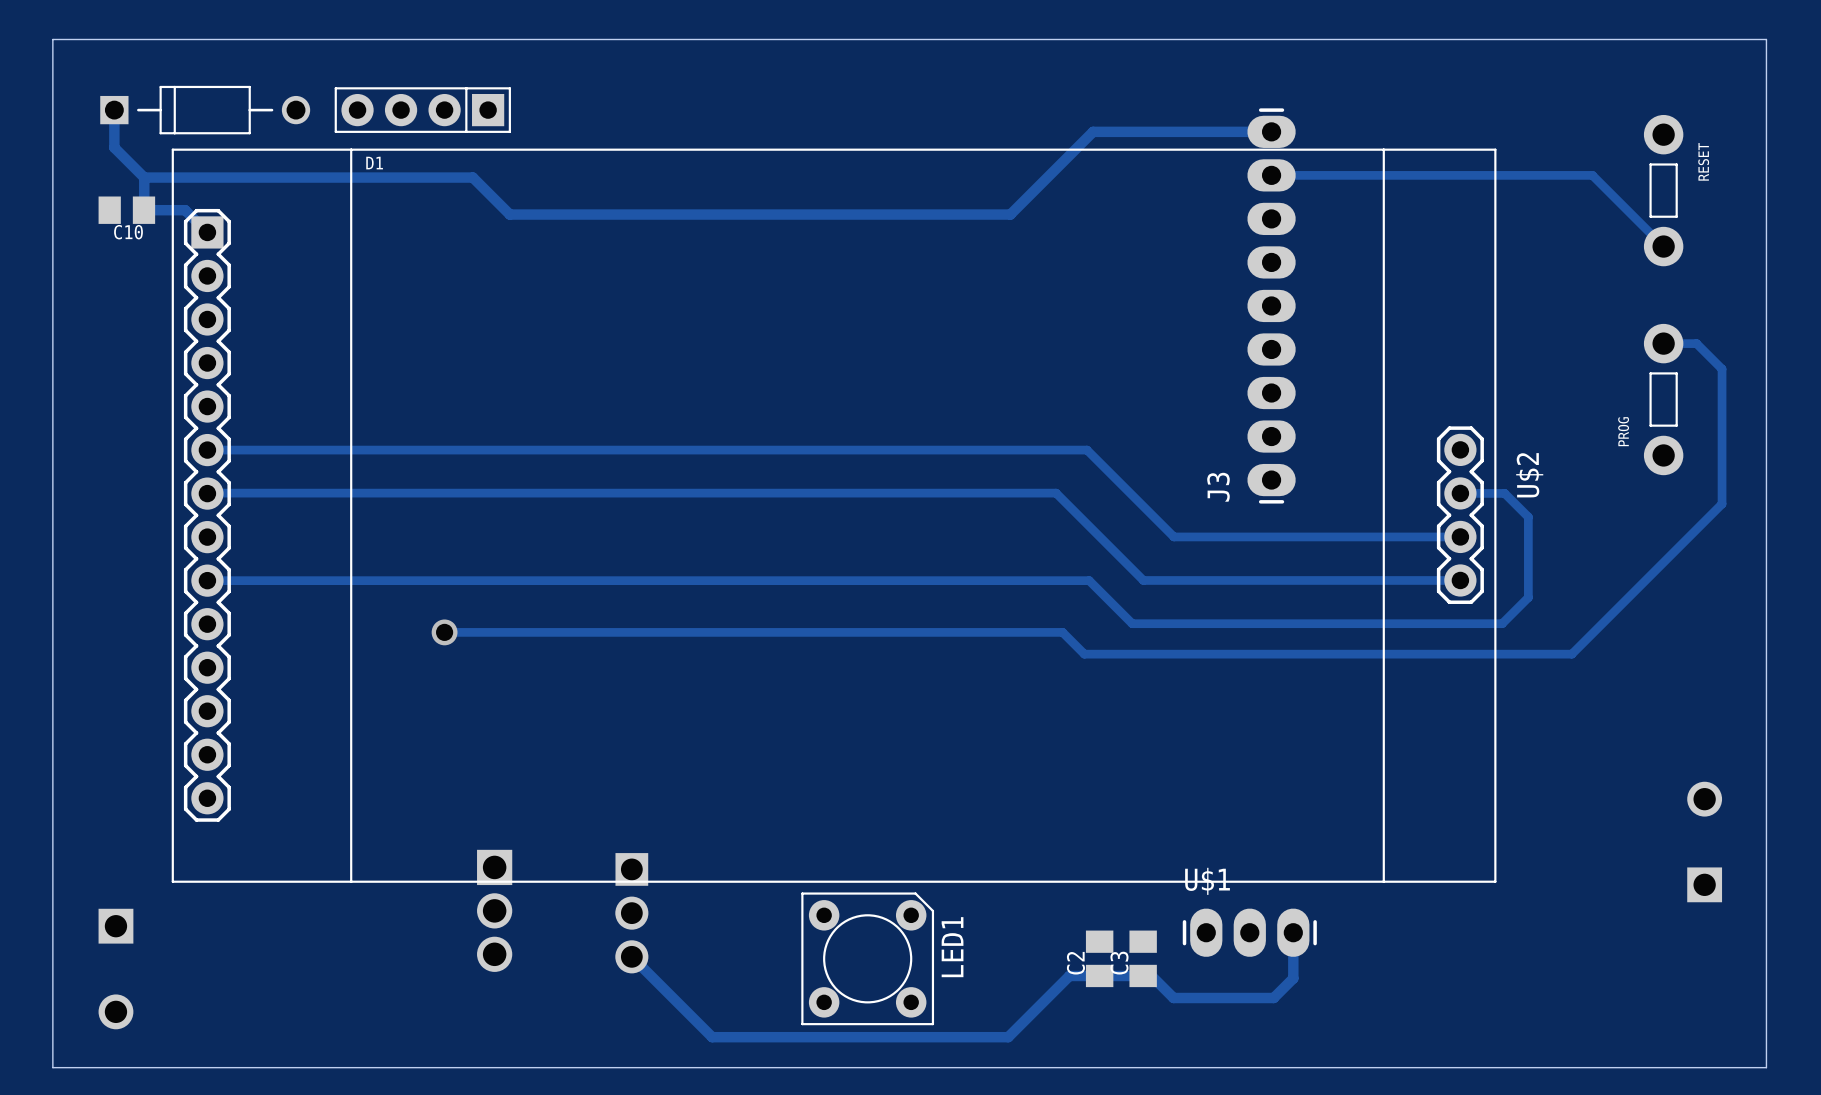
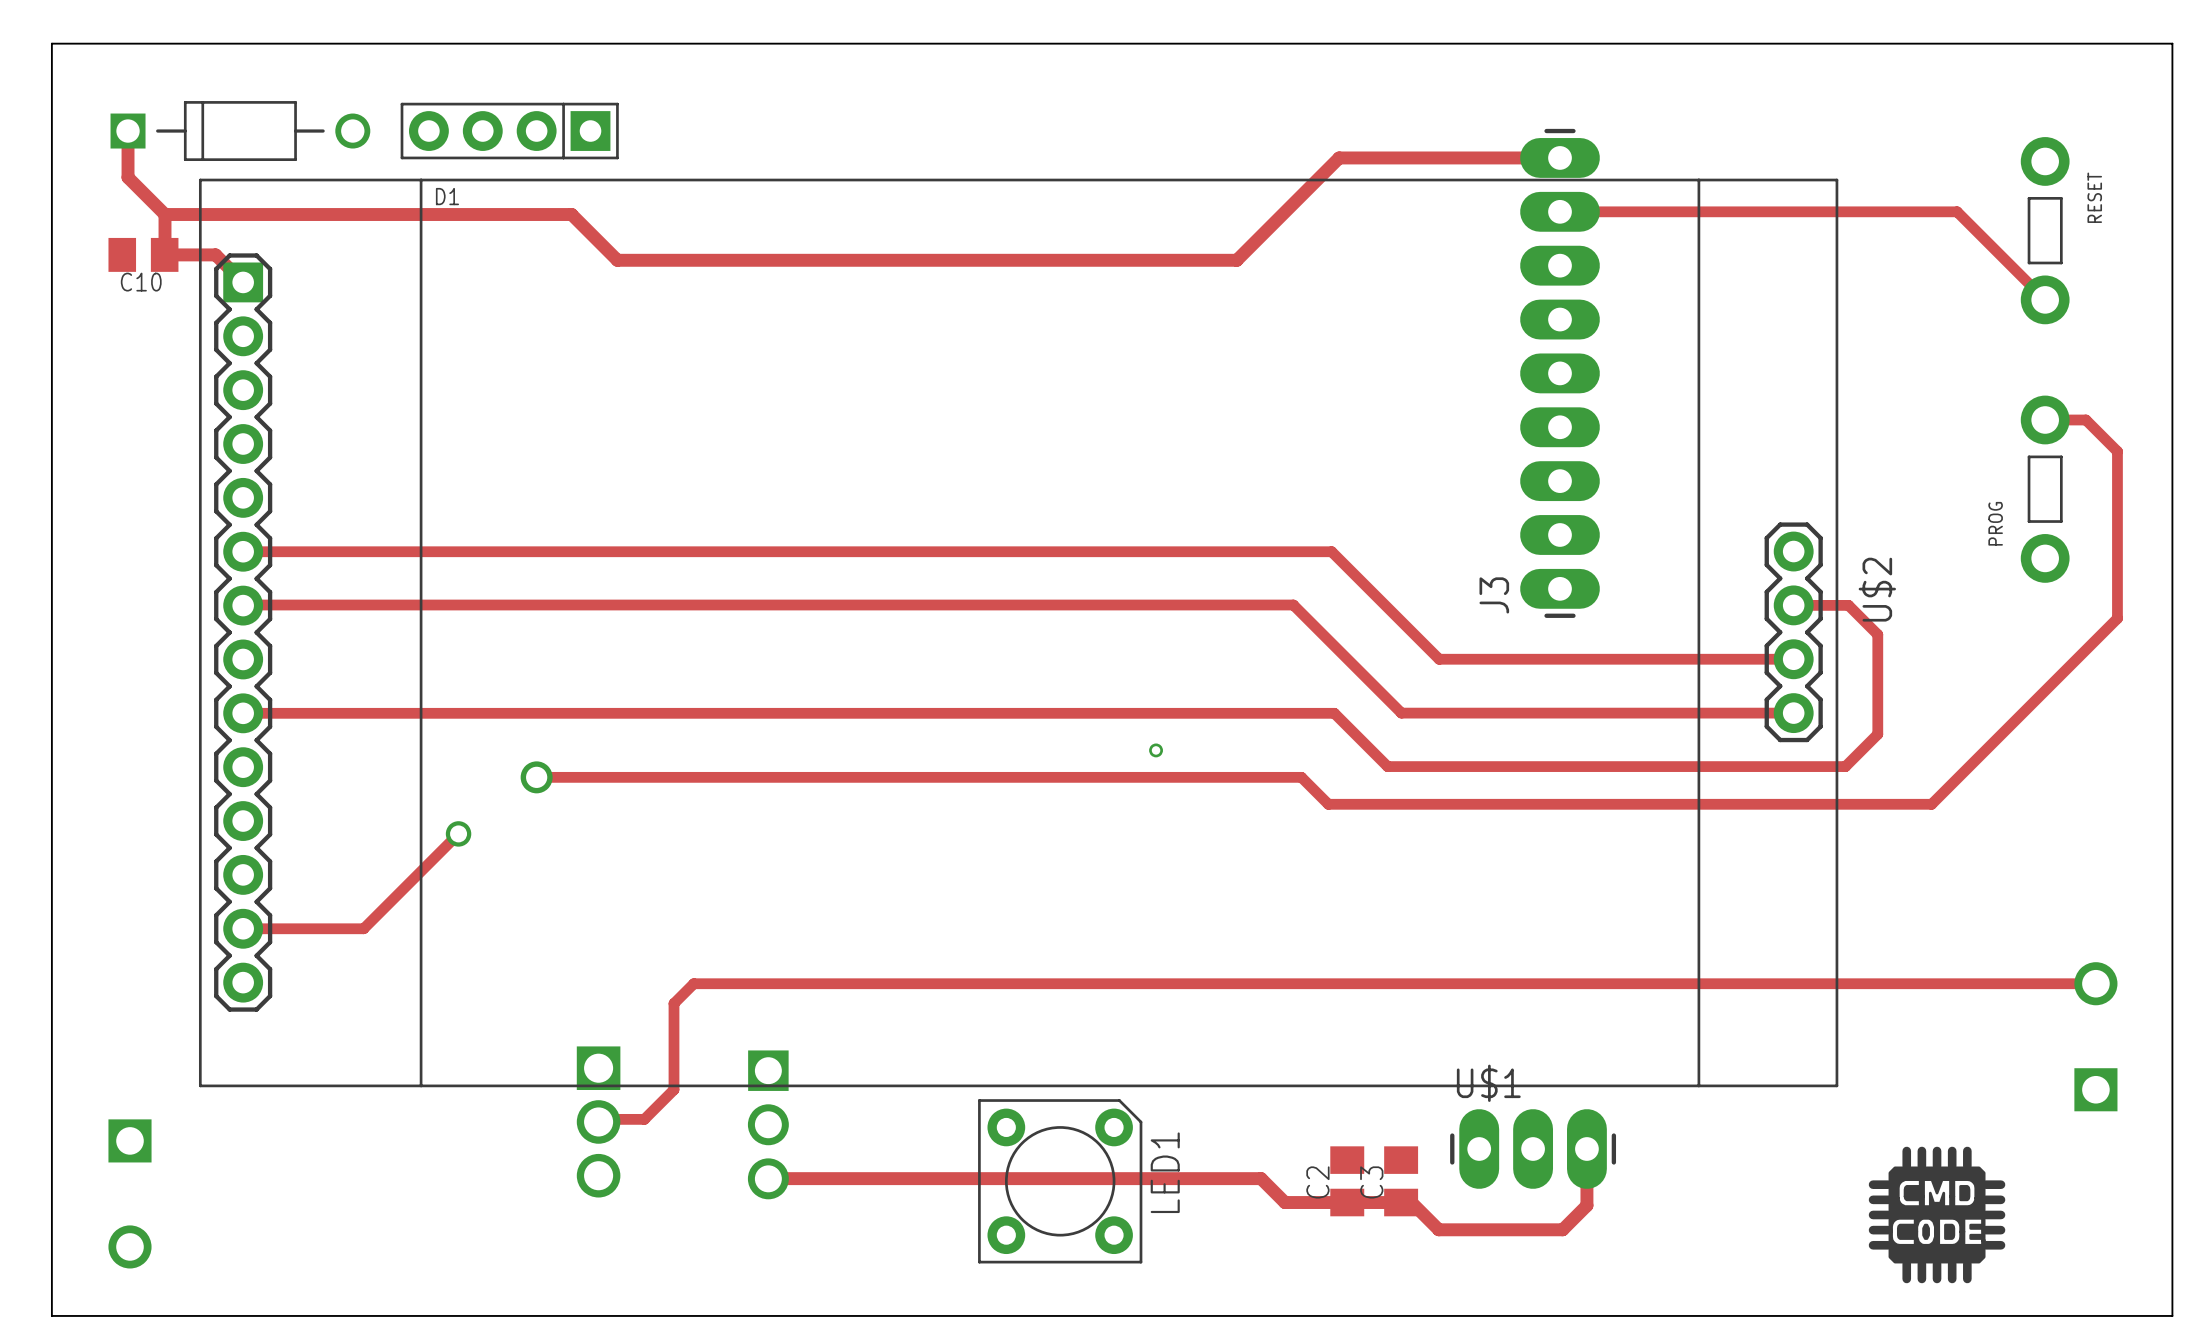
J3 footprint: [1247, 108, 1296, 504] -> [1520, 128, 1600, 618]
via: none -> (1156, 750)
track: none -> (458, 833) (363, 928) (243, 928)
via: none -> (458, 833)
track: none -> (2095, 983) (693, 983) (673, 1003) (673, 1089) (644, 1119) (601, 1119) (598, 1121)
U$1 footprint: [1182, 908, 1317, 957] -> [1450, 1109, 1617, 1189]
drawing: none -> [1868, 1146, 2006, 1284]
track: (631, 956) (712, 1037) (1008, 1037) (1069, 975) -> (768, 1178) (1261, 1178) (1284, 1202) (1309, 1202)

